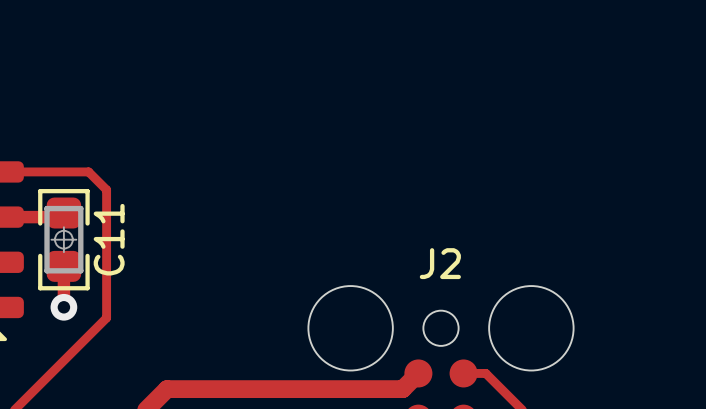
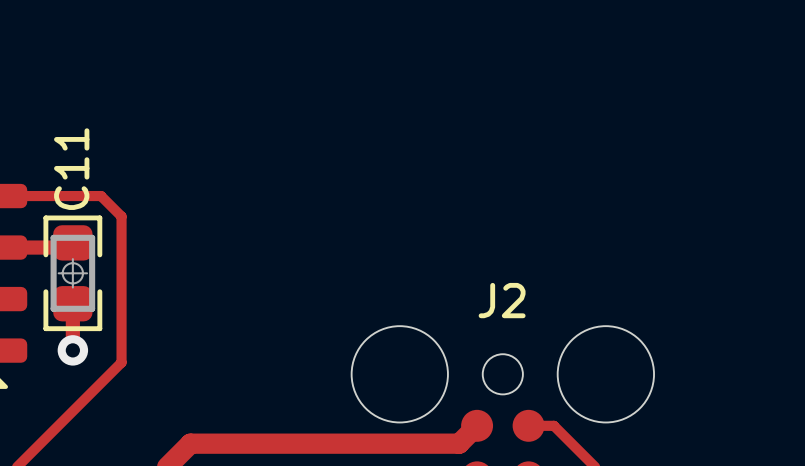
C11 name position: C11 (109, 239) -> C11 (71, 169)

